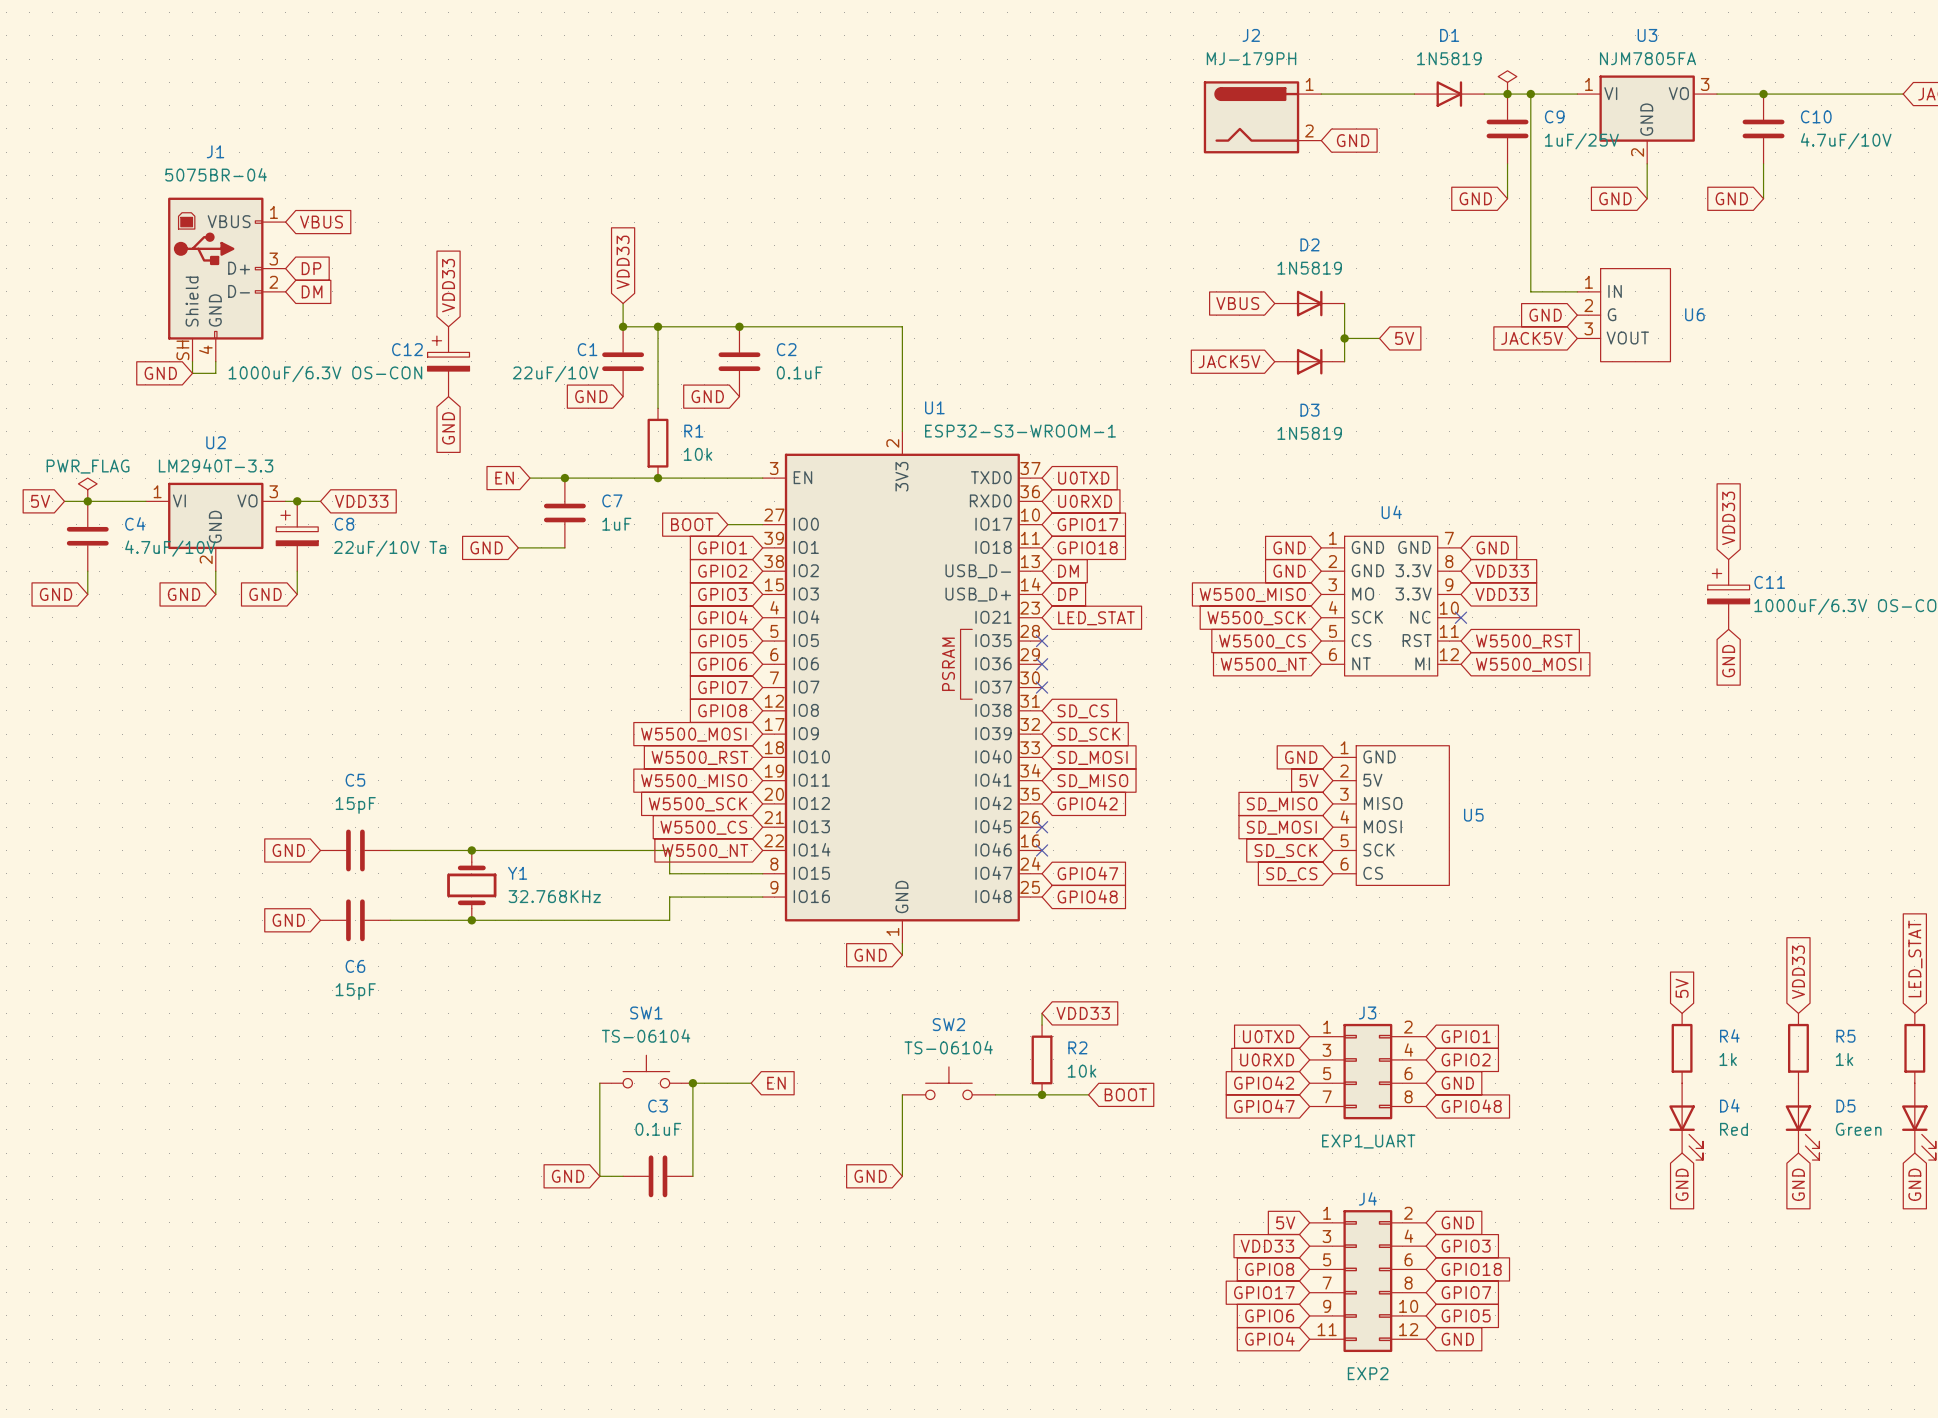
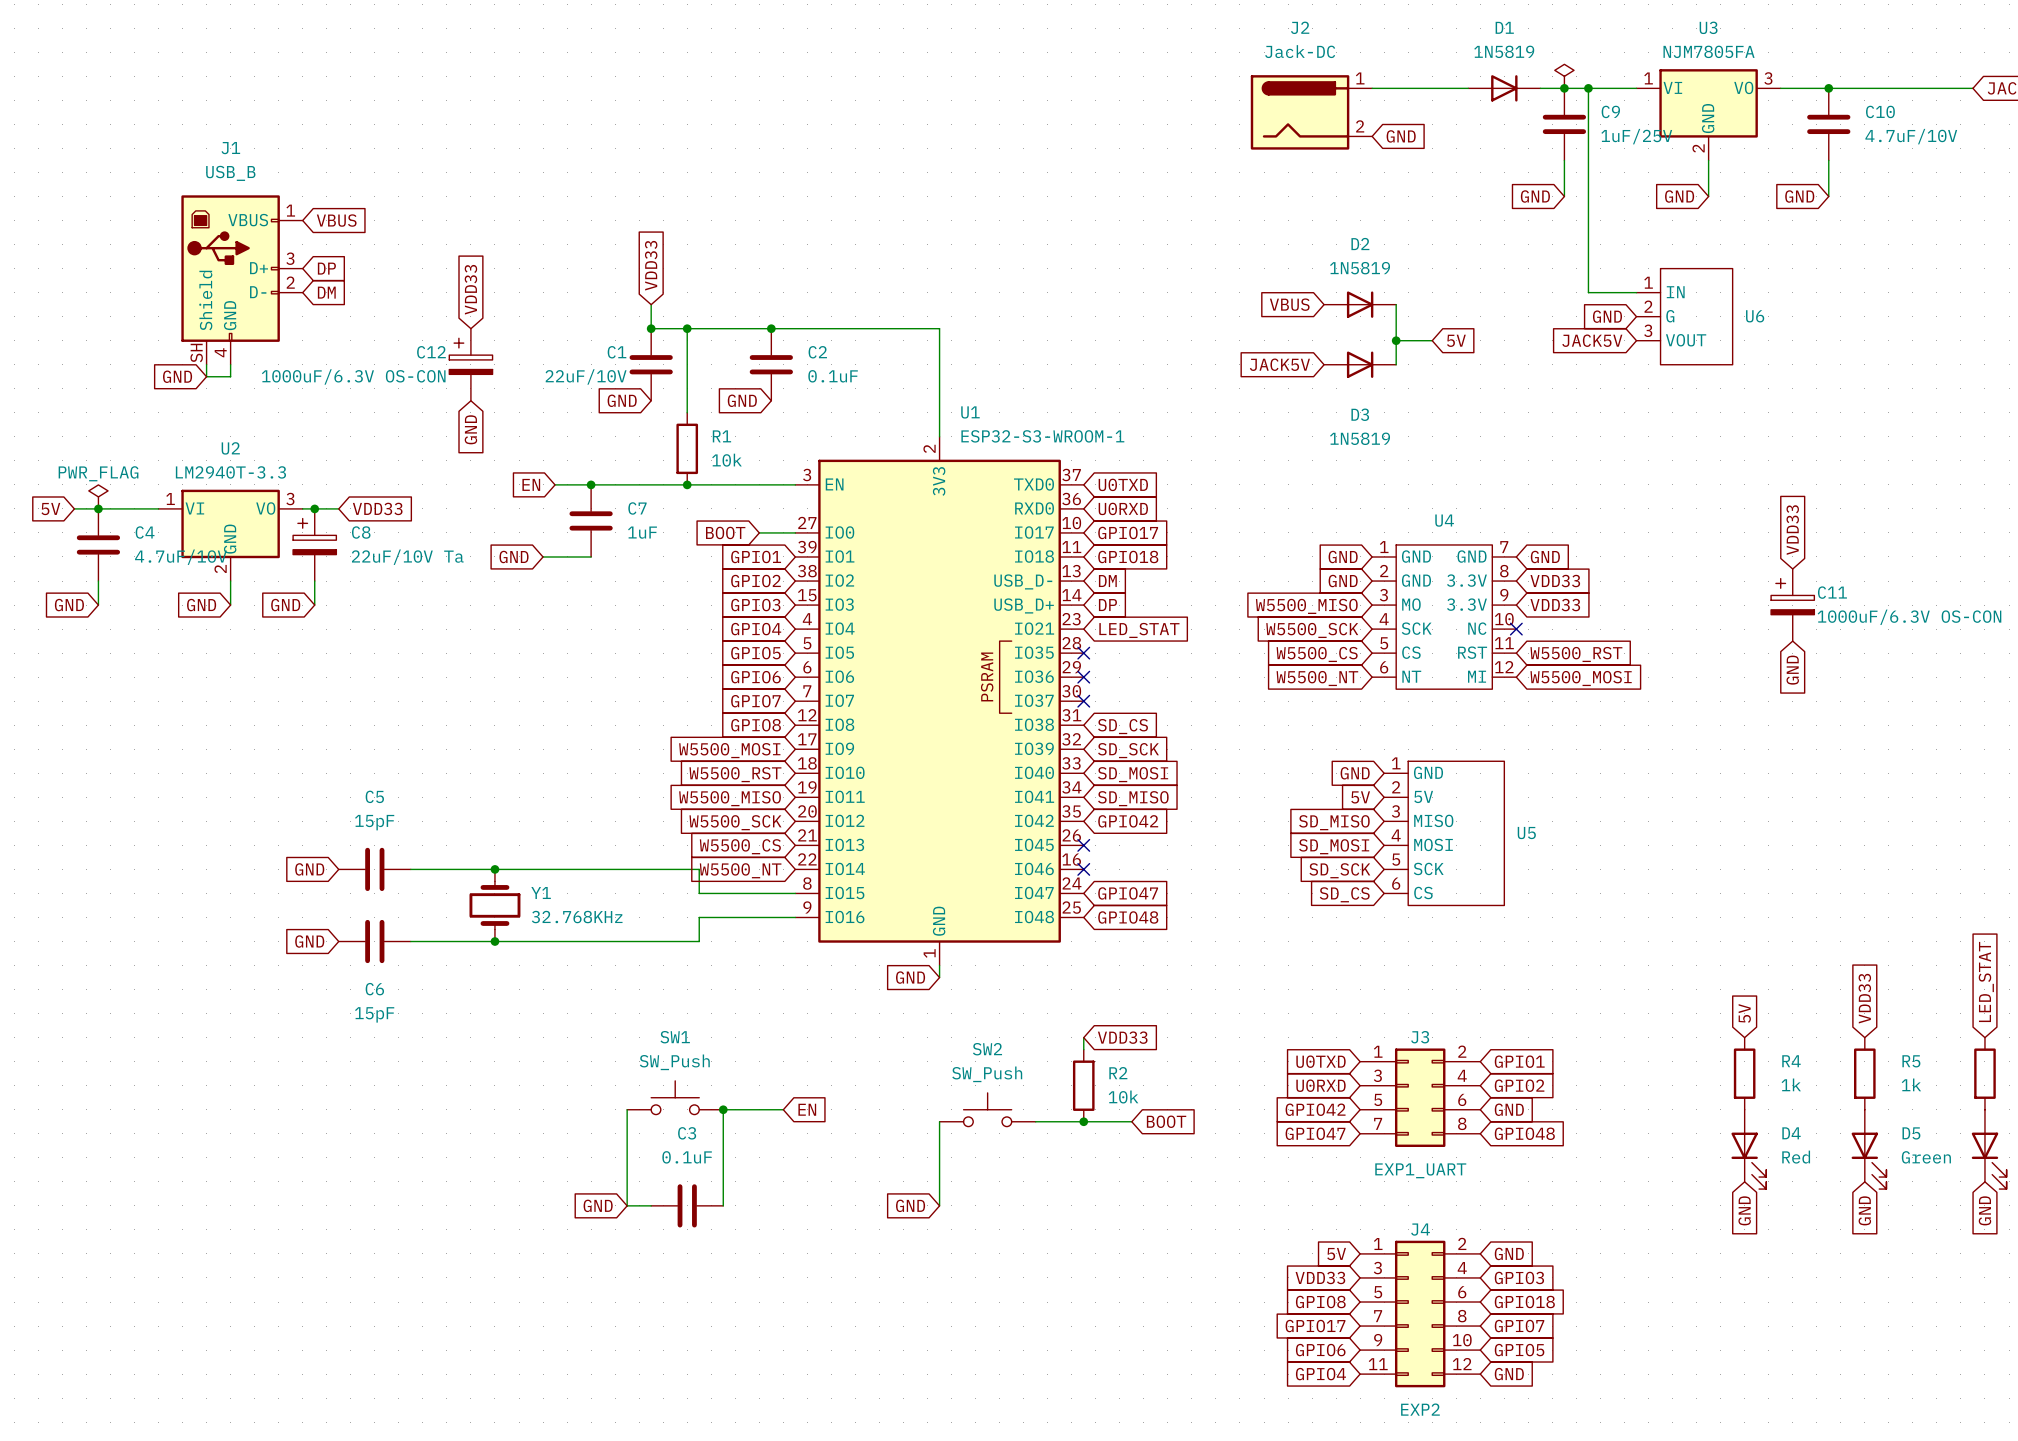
J2 value: MJ-179PH (1251, 58) -> Jack-DC (1300, 51)
J1 value: 5075BR-04 (216, 174) -> USB_B (230, 173)
SW1 value: TS-06104 (646, 1035) -> SW_Push (674, 1062)
SW2 value: TS-06104 (948, 1047) -> SW_Push (987, 1074)

